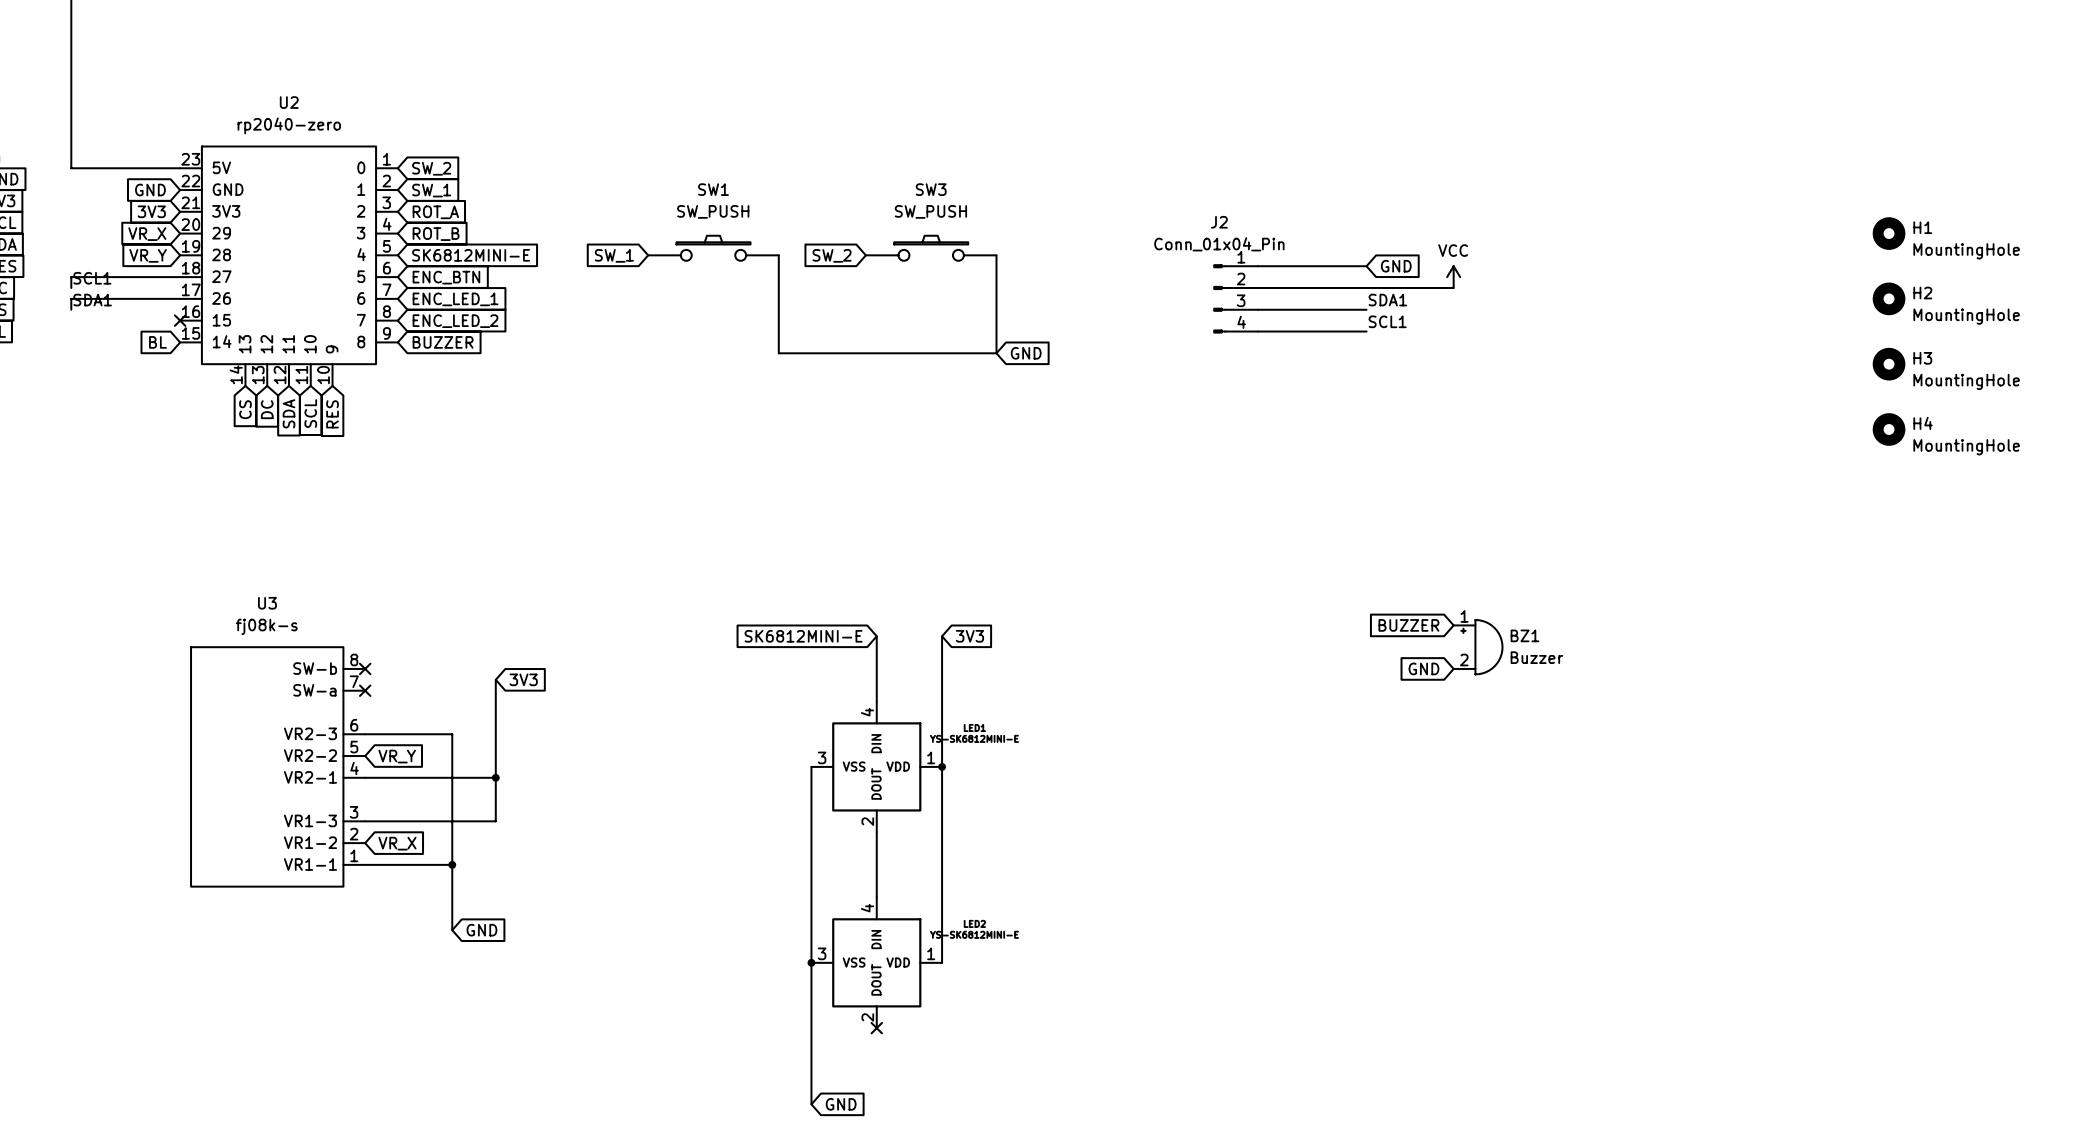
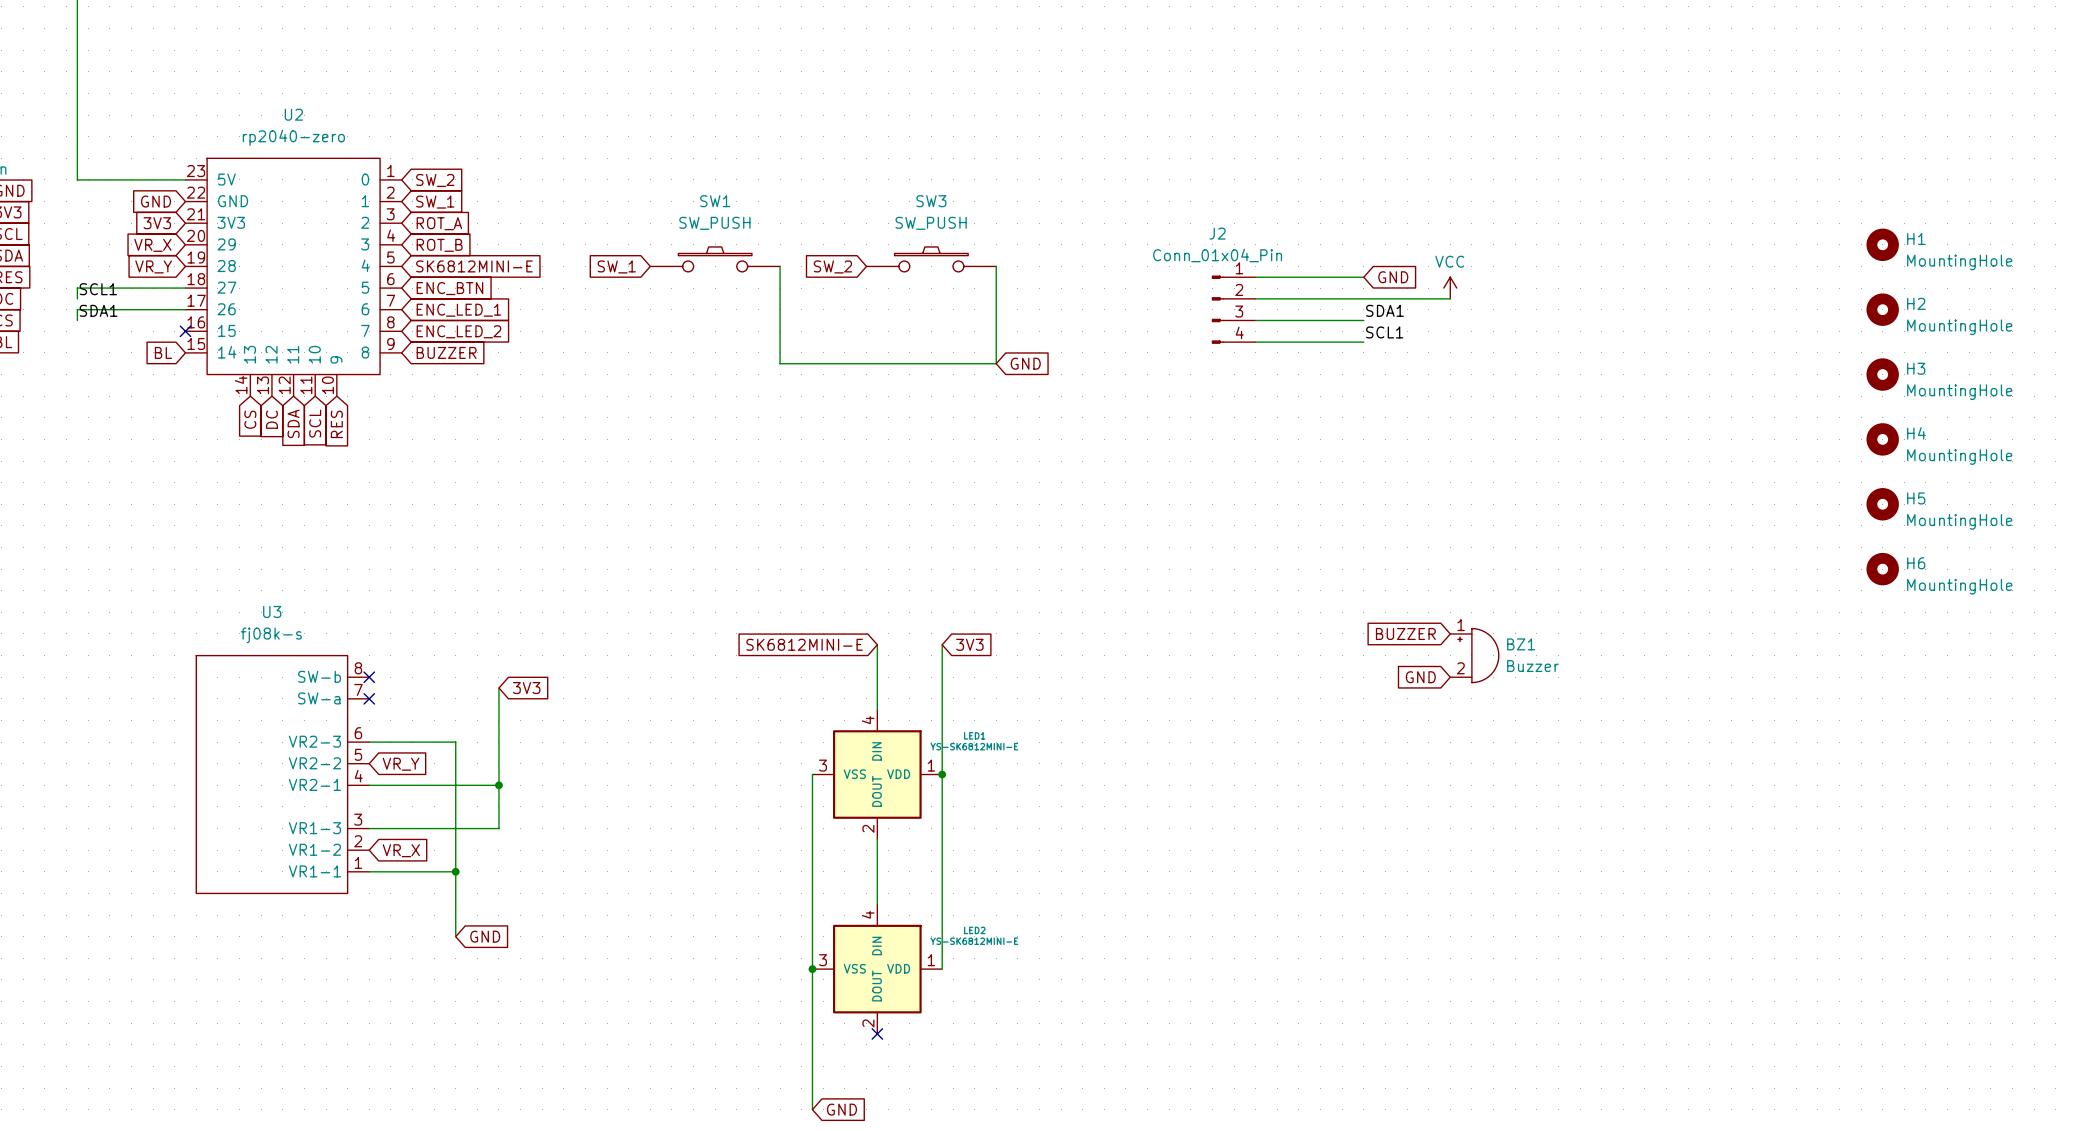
H5: none -> MountingHole (1882, 504)
H6: none -> MountingHole (1882, 569)

